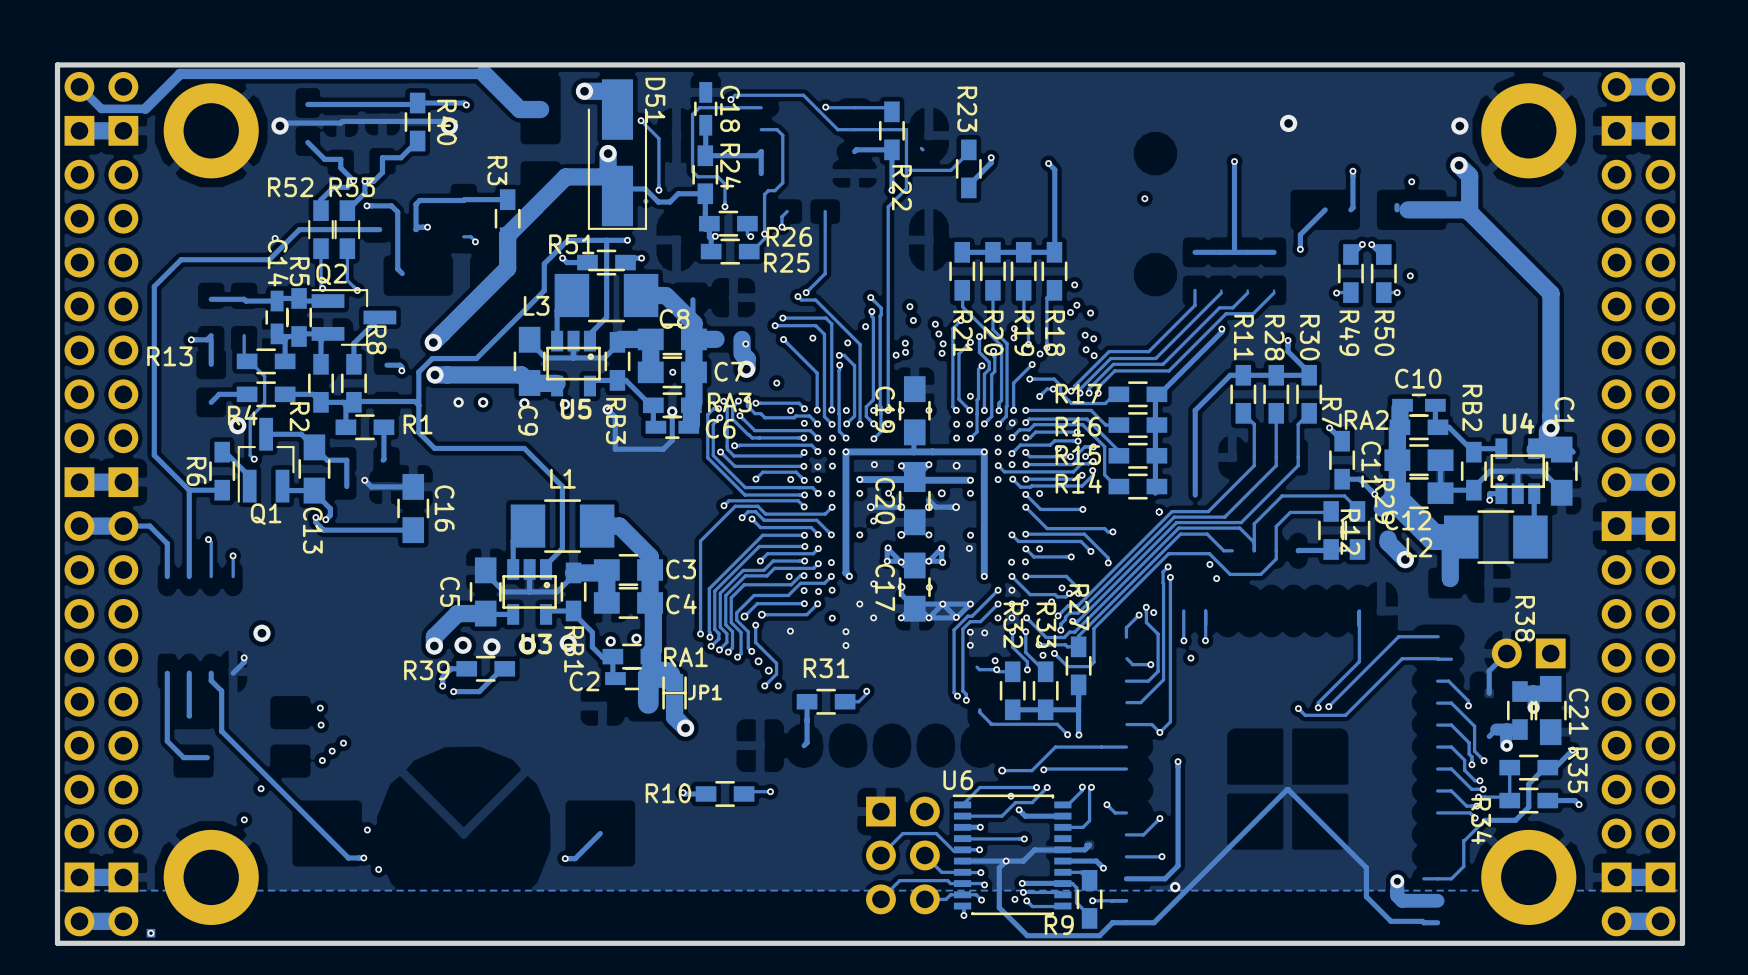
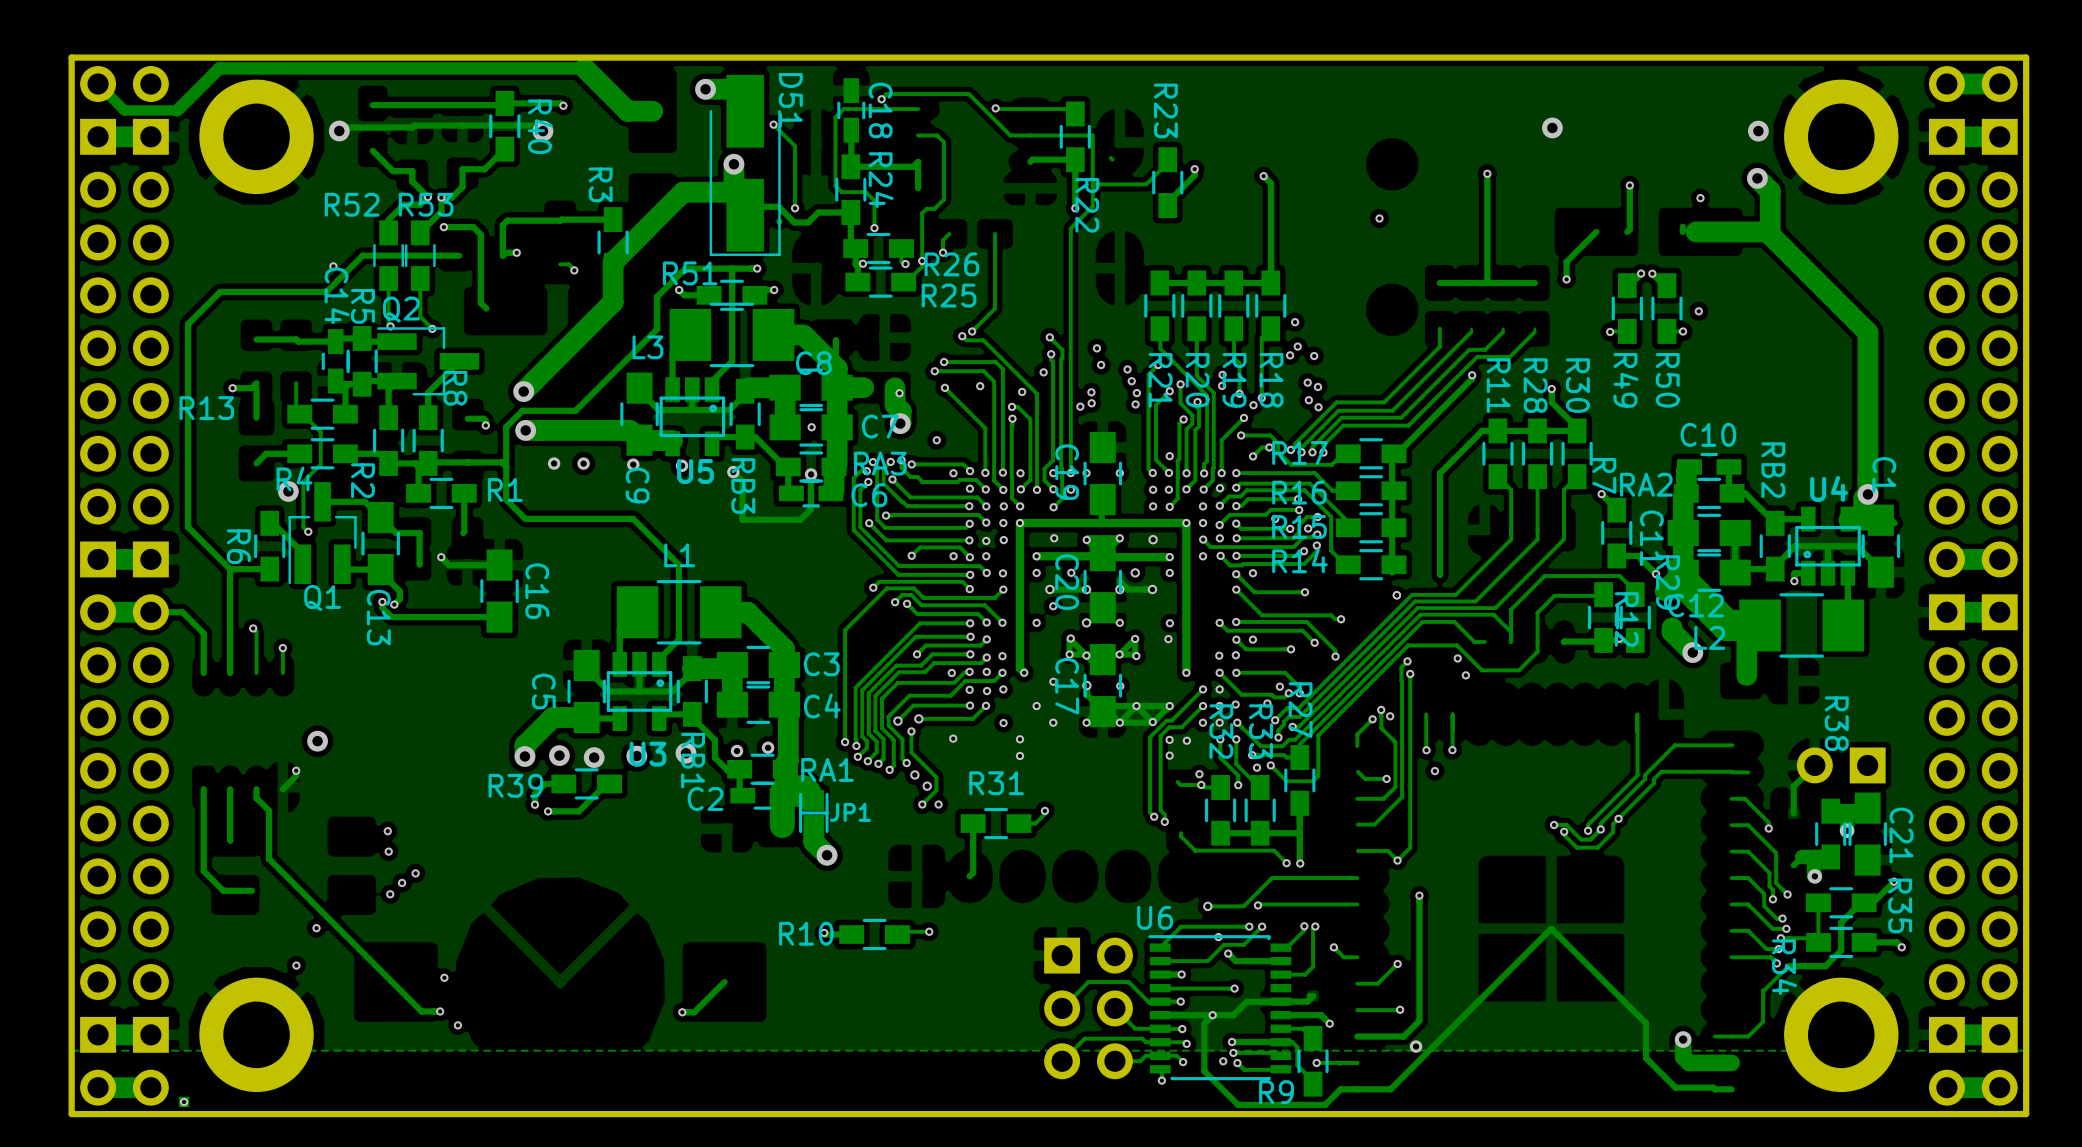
track: (1398, 636) (1328, 706) -> (1684, 745) (1674, 745) (1645, 775) (1645, 779) (1600, 823) (1600, 829) (1590, 839) (1581, 839) (1566, 825) (1554, 825)
track: (1402, 658) (1345, 715) (1305, 715) (1298, 708) -> (1689, 771) (1661, 771) (1653, 779) (1653, 783) (1613, 824) (1613, 832) (1597, 847) (1576, 847) (1563, 834)
via: none -> (1618, 818)
via: none -> (1554, 825)

